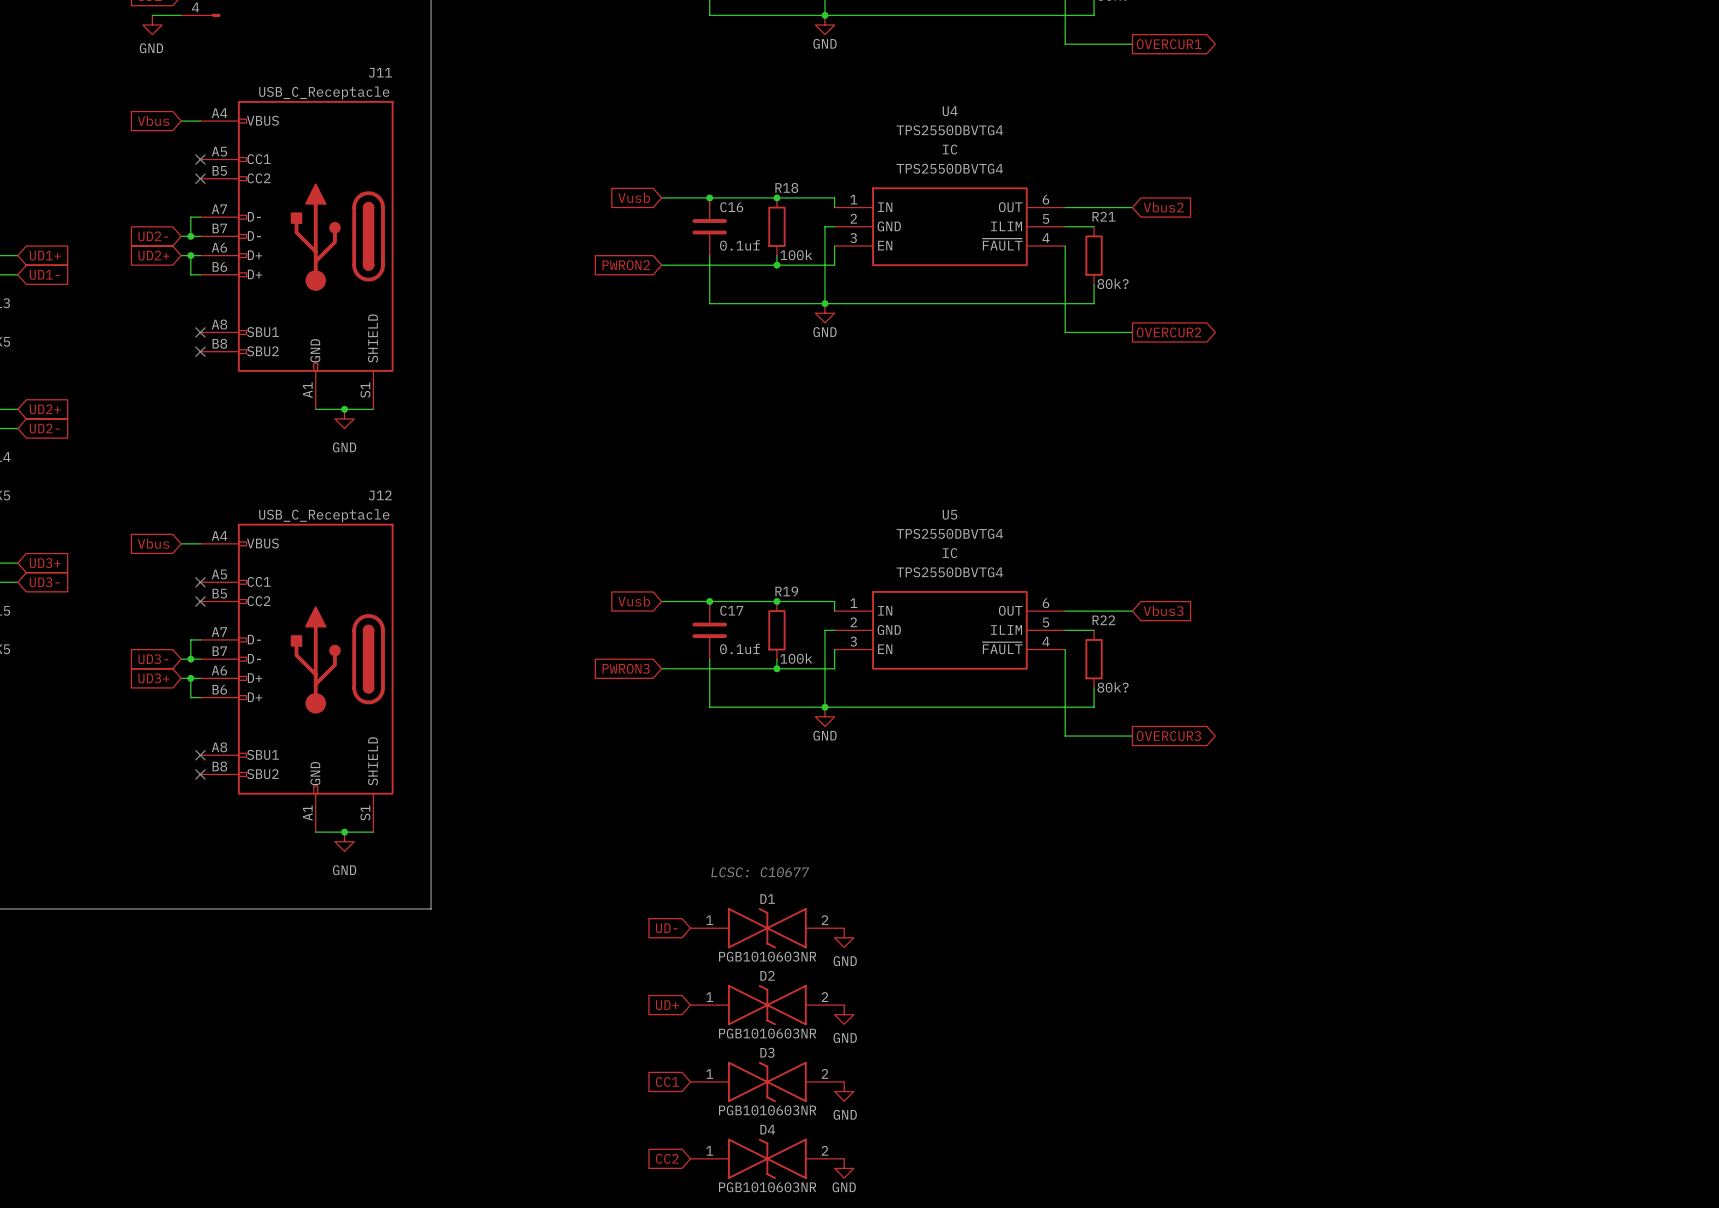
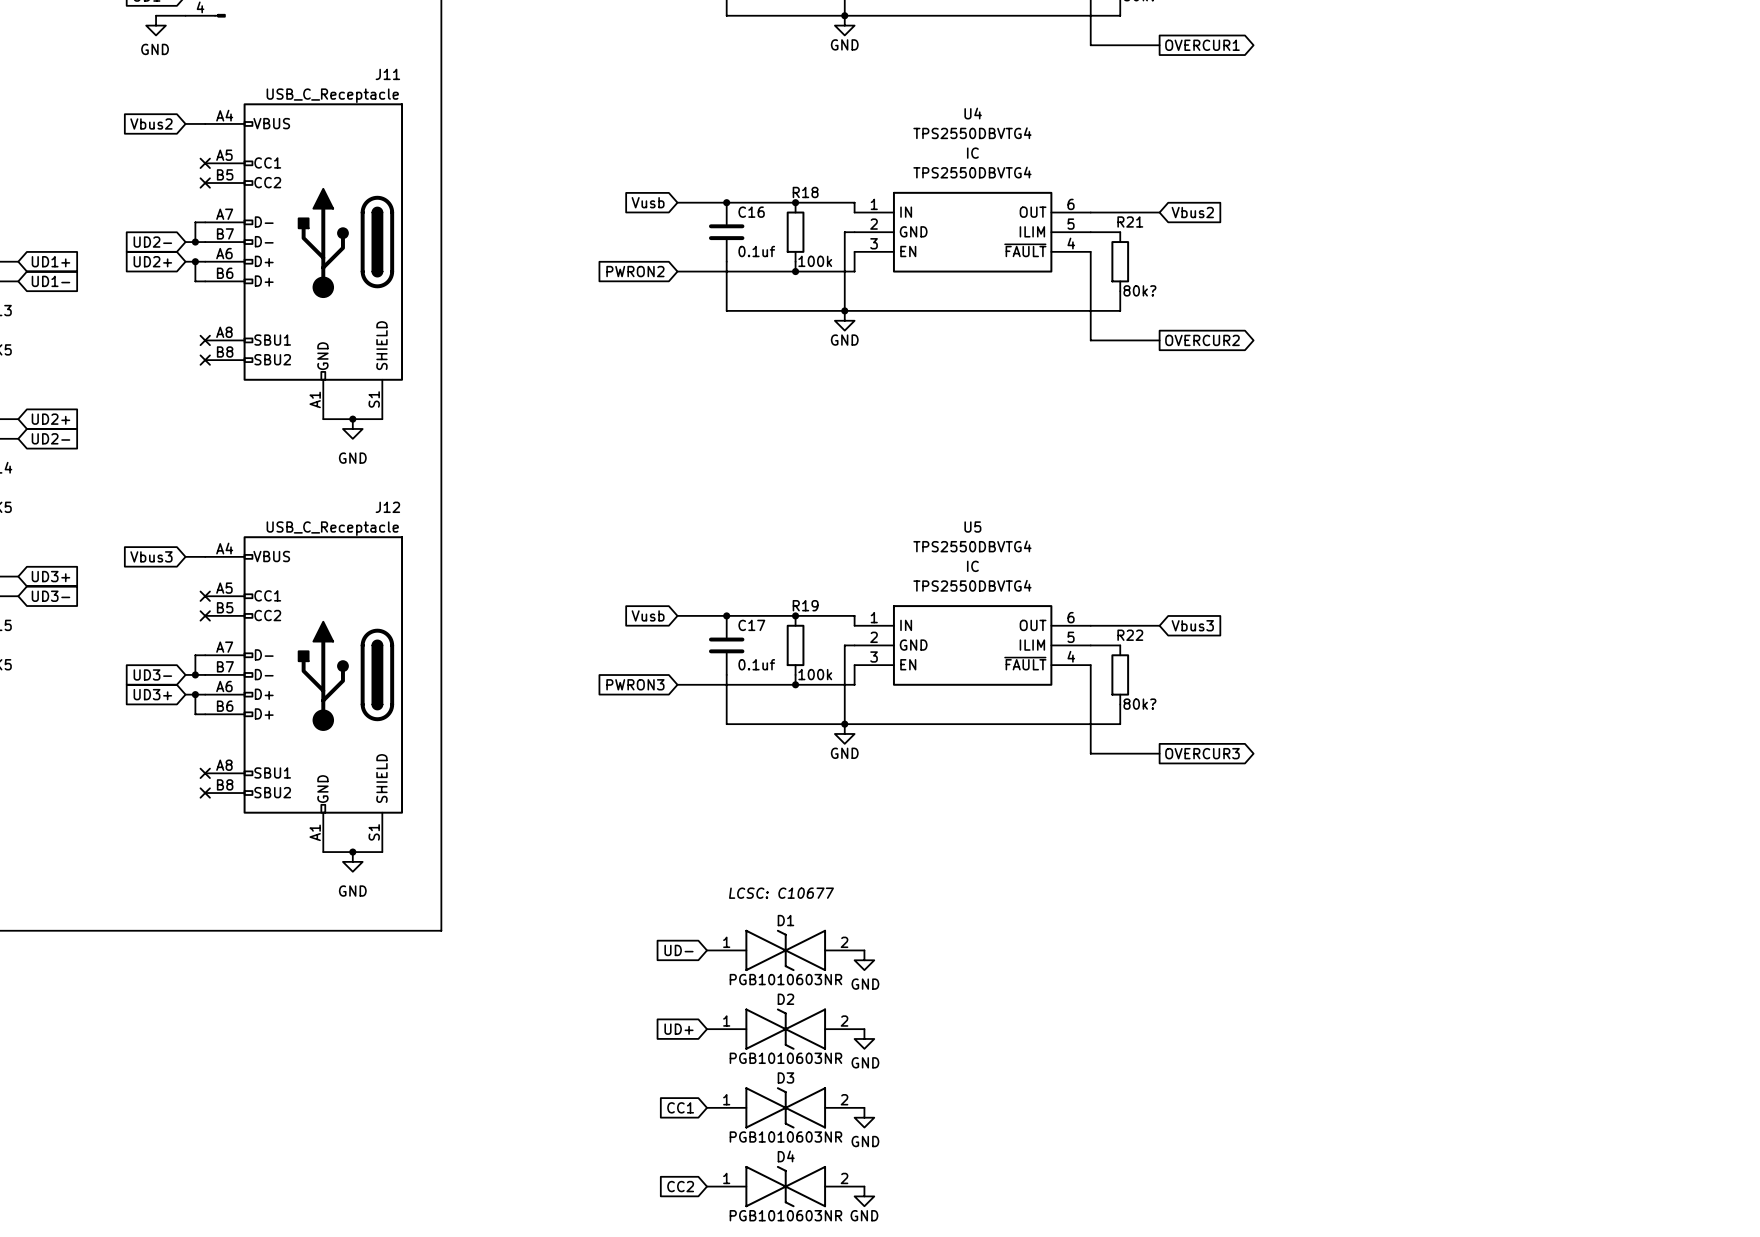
global label: Vbus (153, 120) -> Vbus2 (151, 123)
global label: Vbus (153, 543) -> Vbus3 (151, 556)

